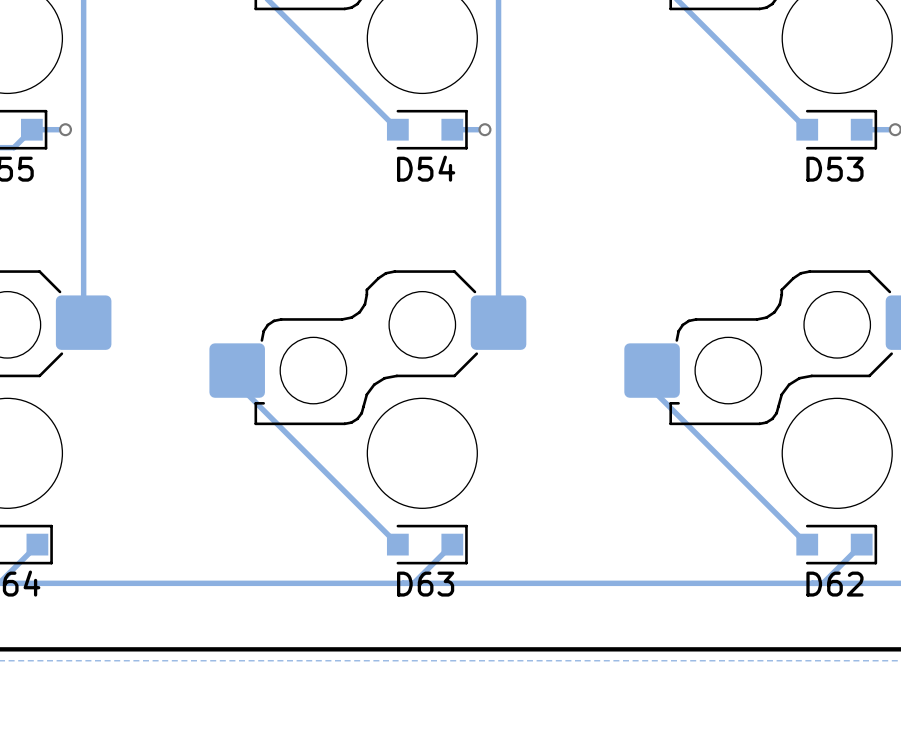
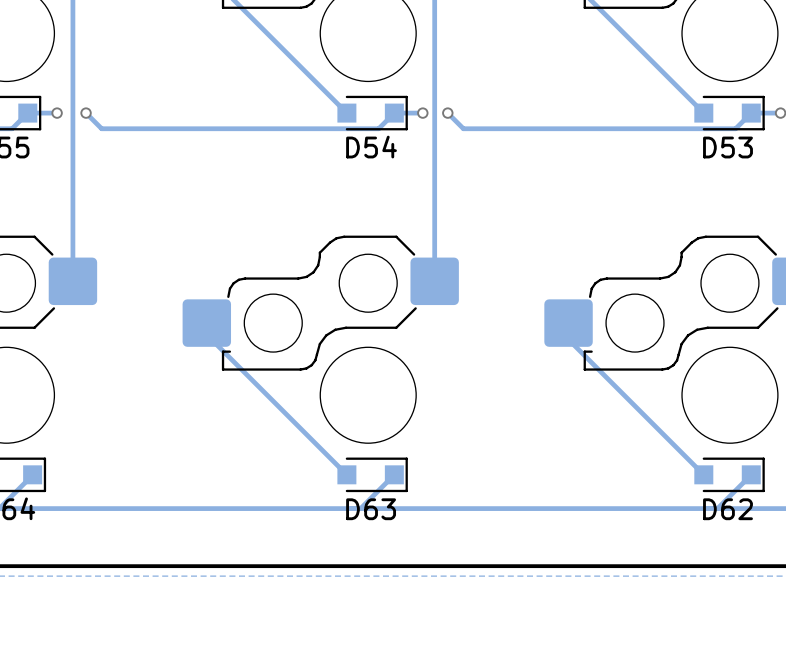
via: none -> (86, 113)
track: none -> (394, 113) (378, 128) (101, 128) (86, 113)
via: none -> (447, 113)
track: none -> (751, 113) (735, 128) (463, 128) (447, 113)

